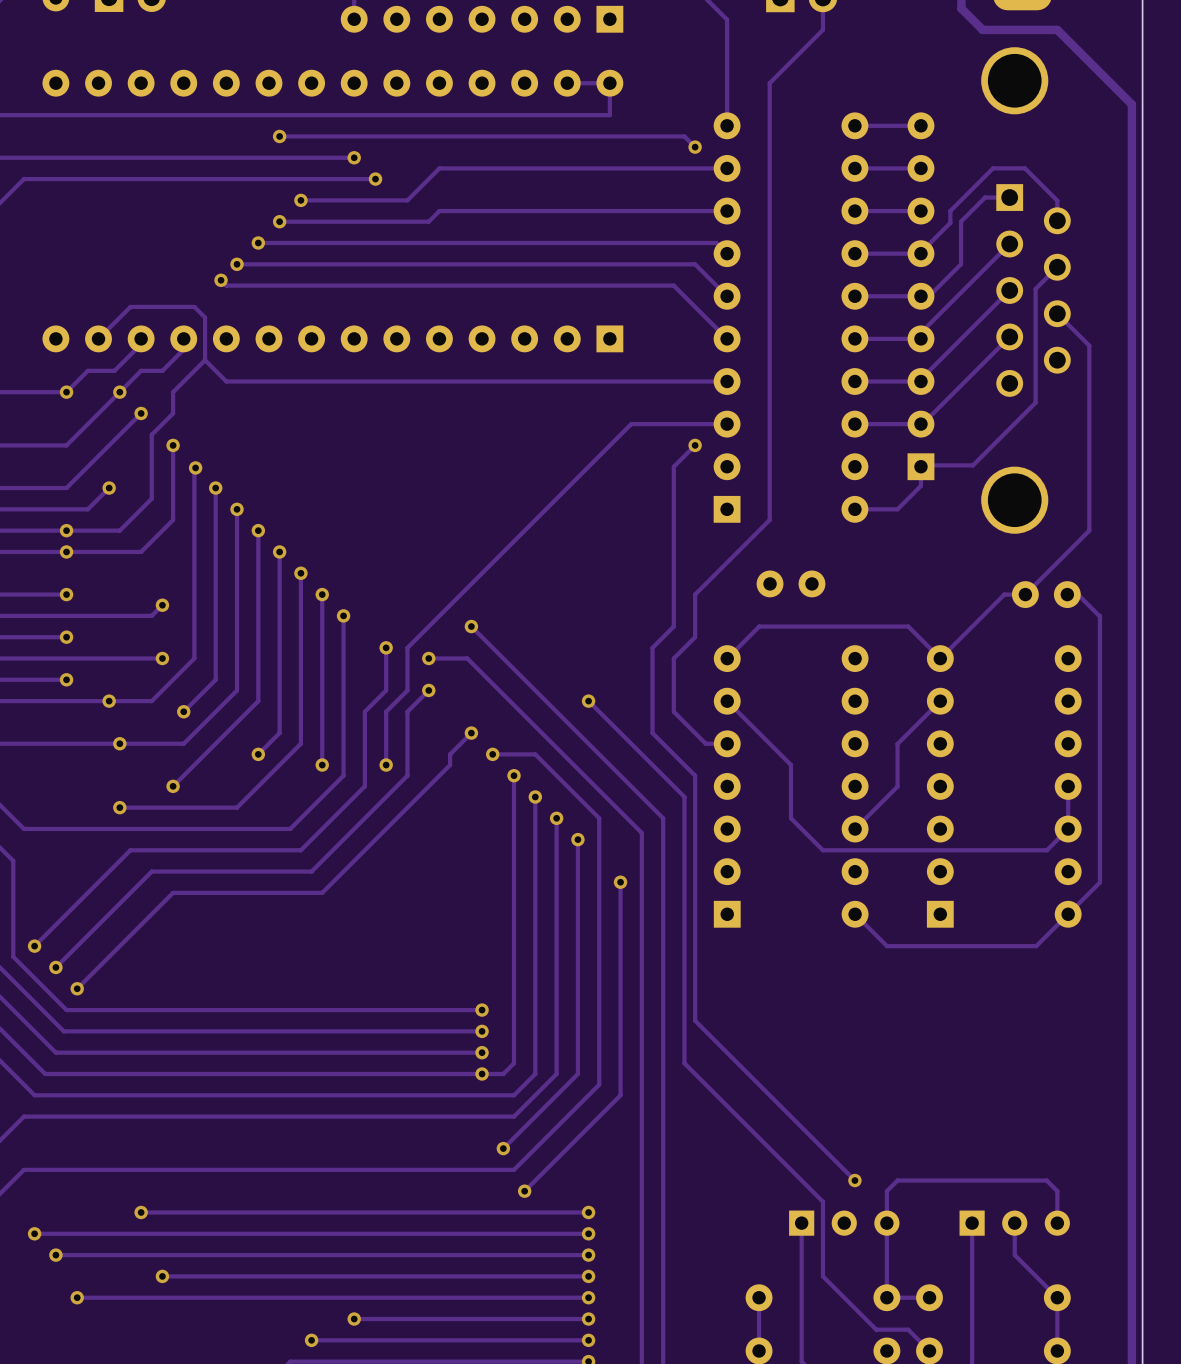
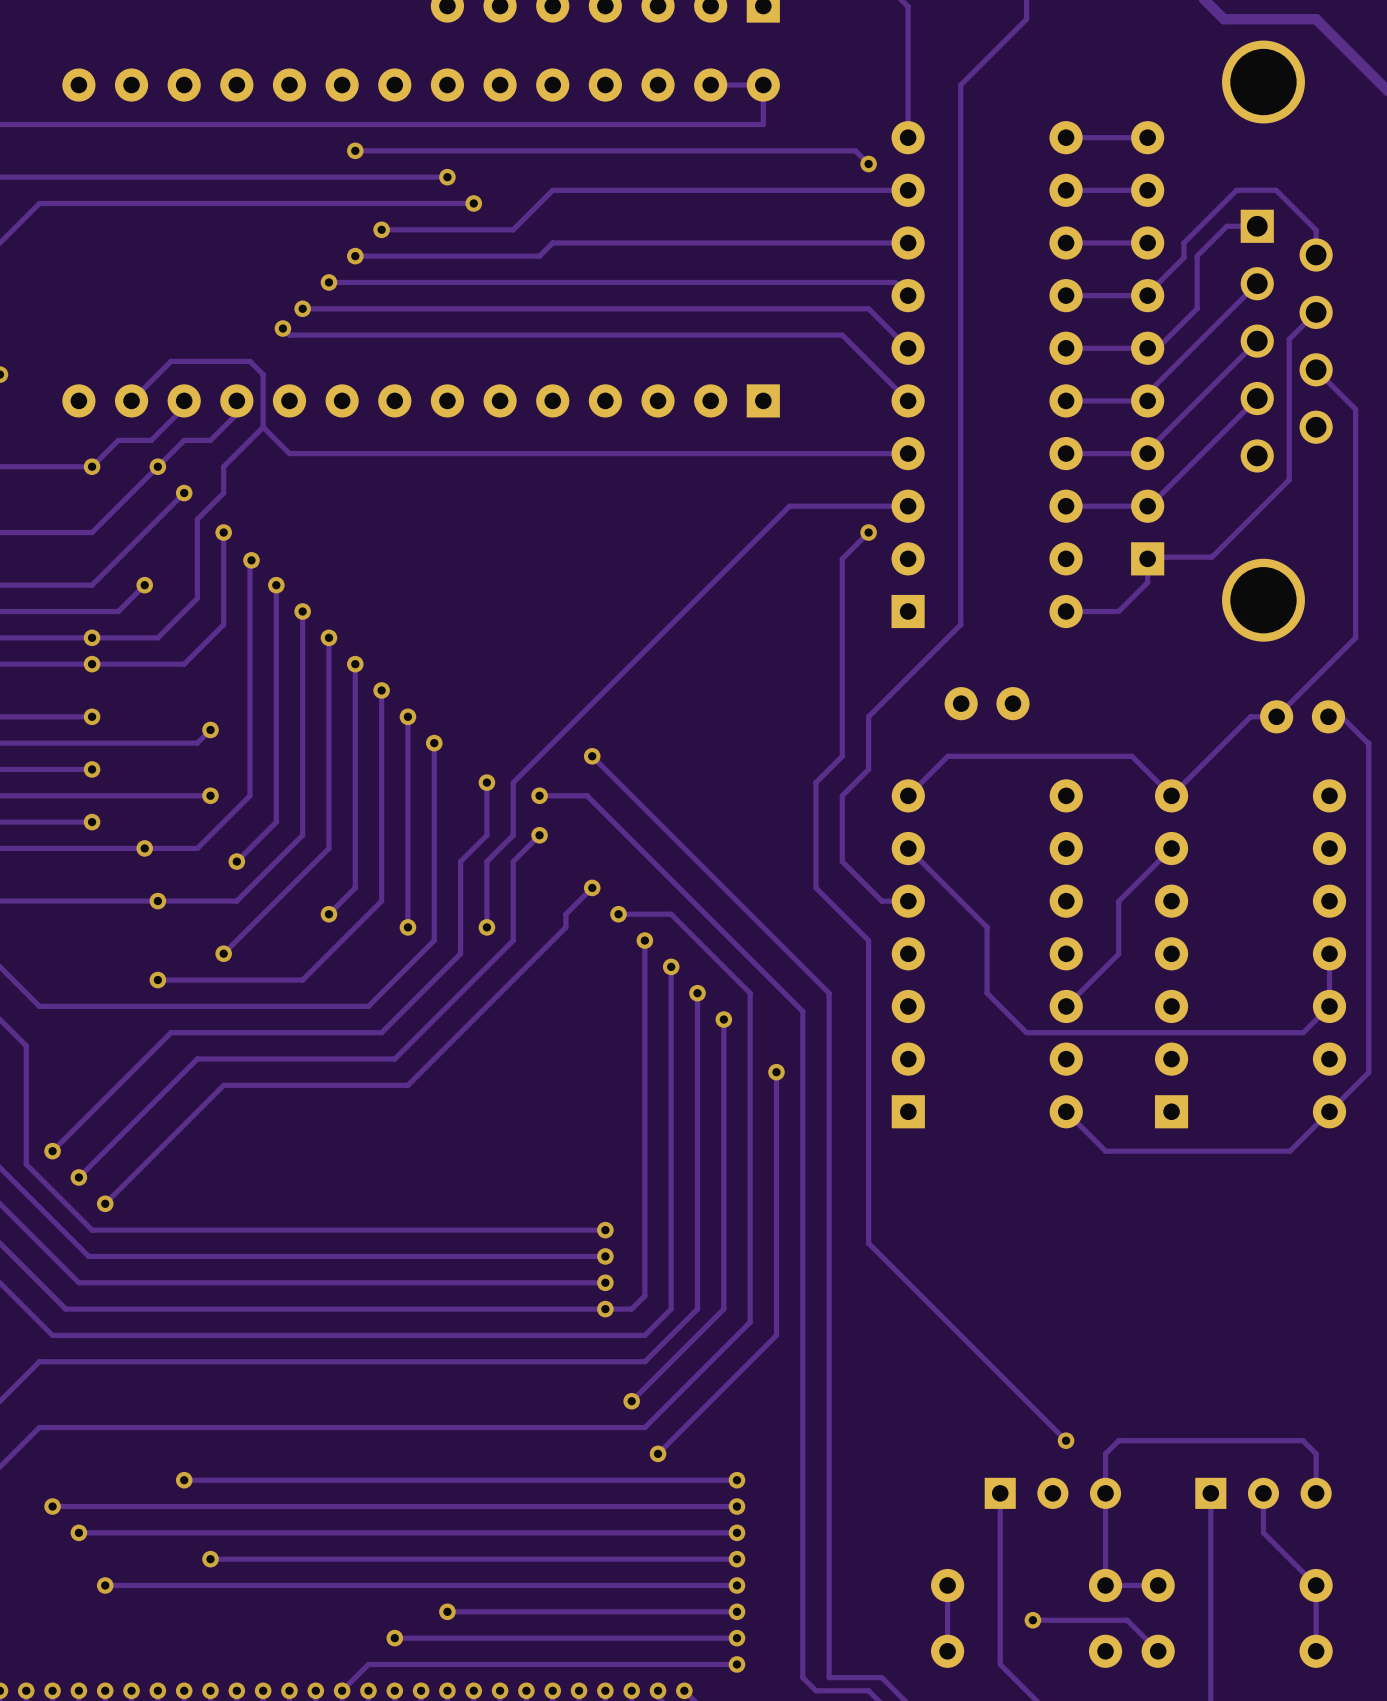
track: (588, 701) (684, 796) (684, 1063) (822, 1201) (822, 1276) (876, 1329) (908, 1329) -> (1032, 1620) (1127, 1620) (1131, 1624)
via: (588, 701) -> none
via: none -> (1032, 1620)

